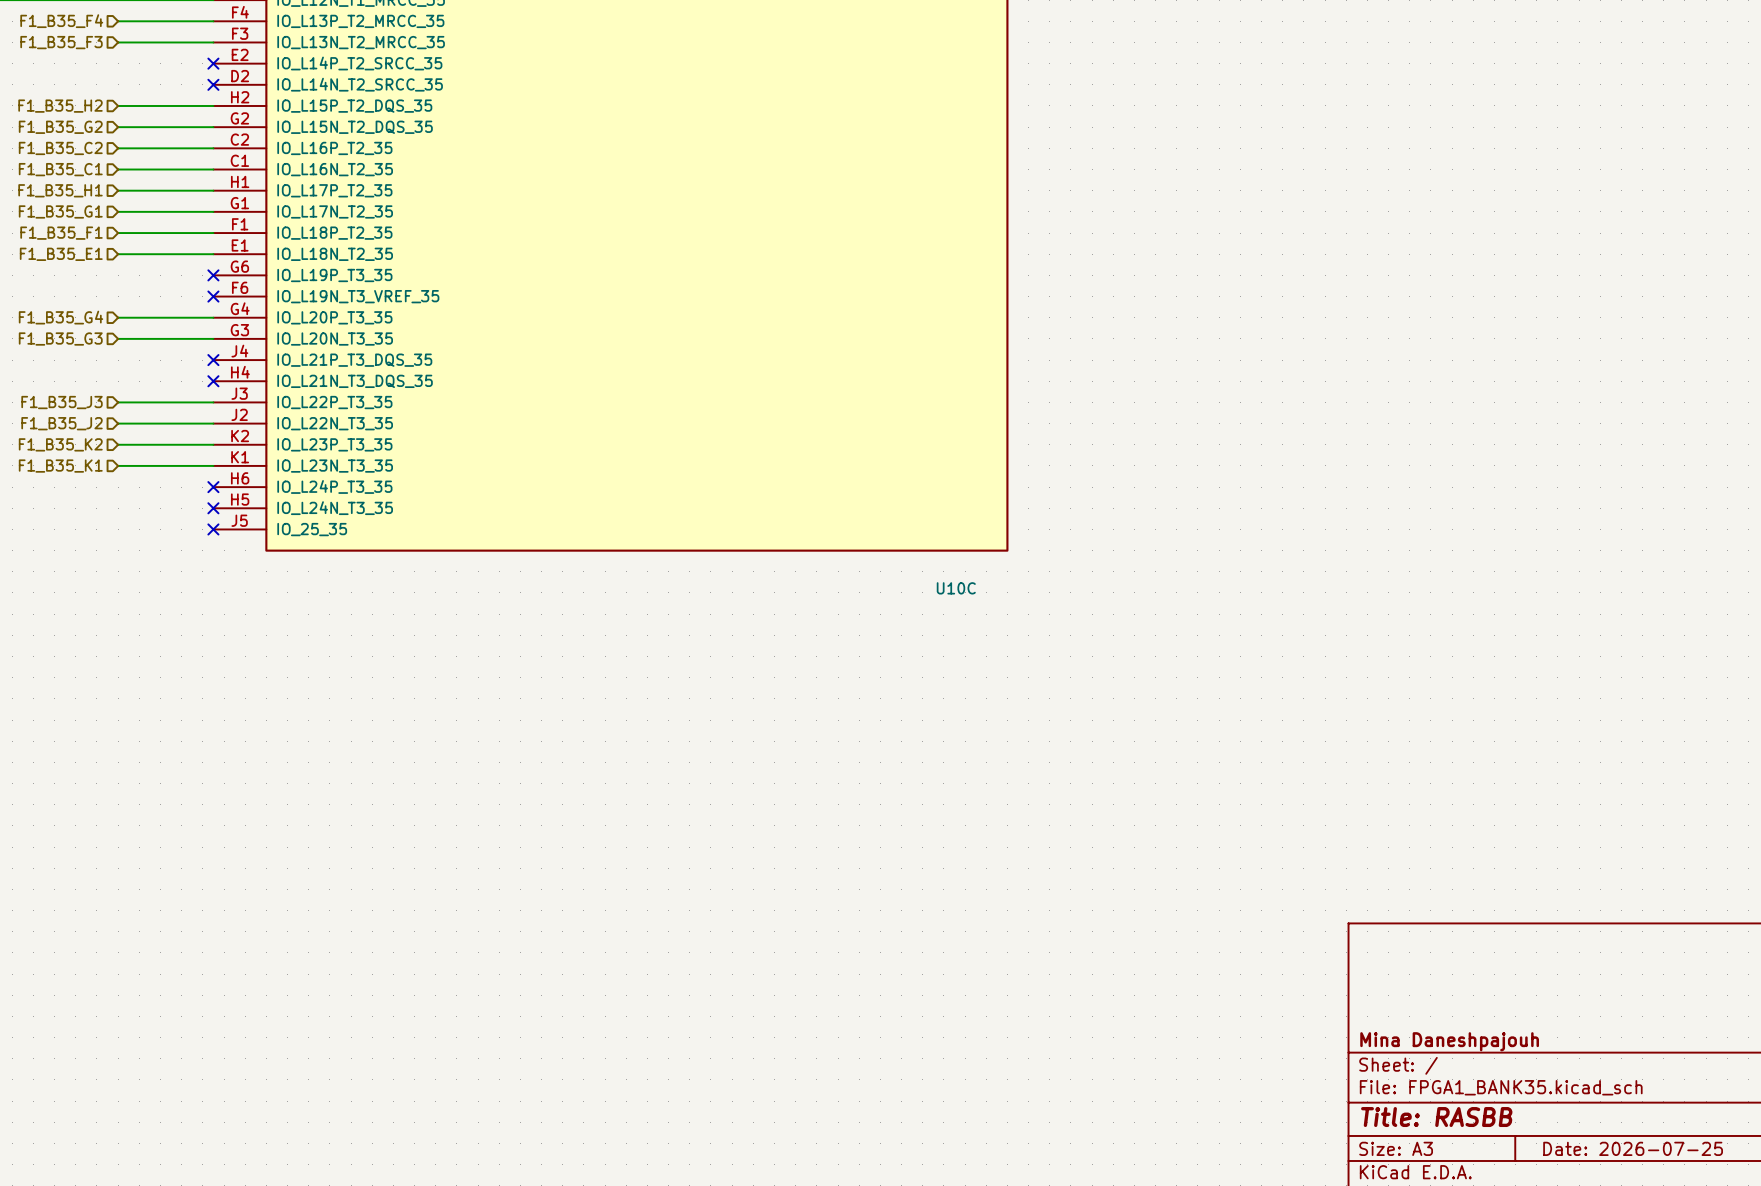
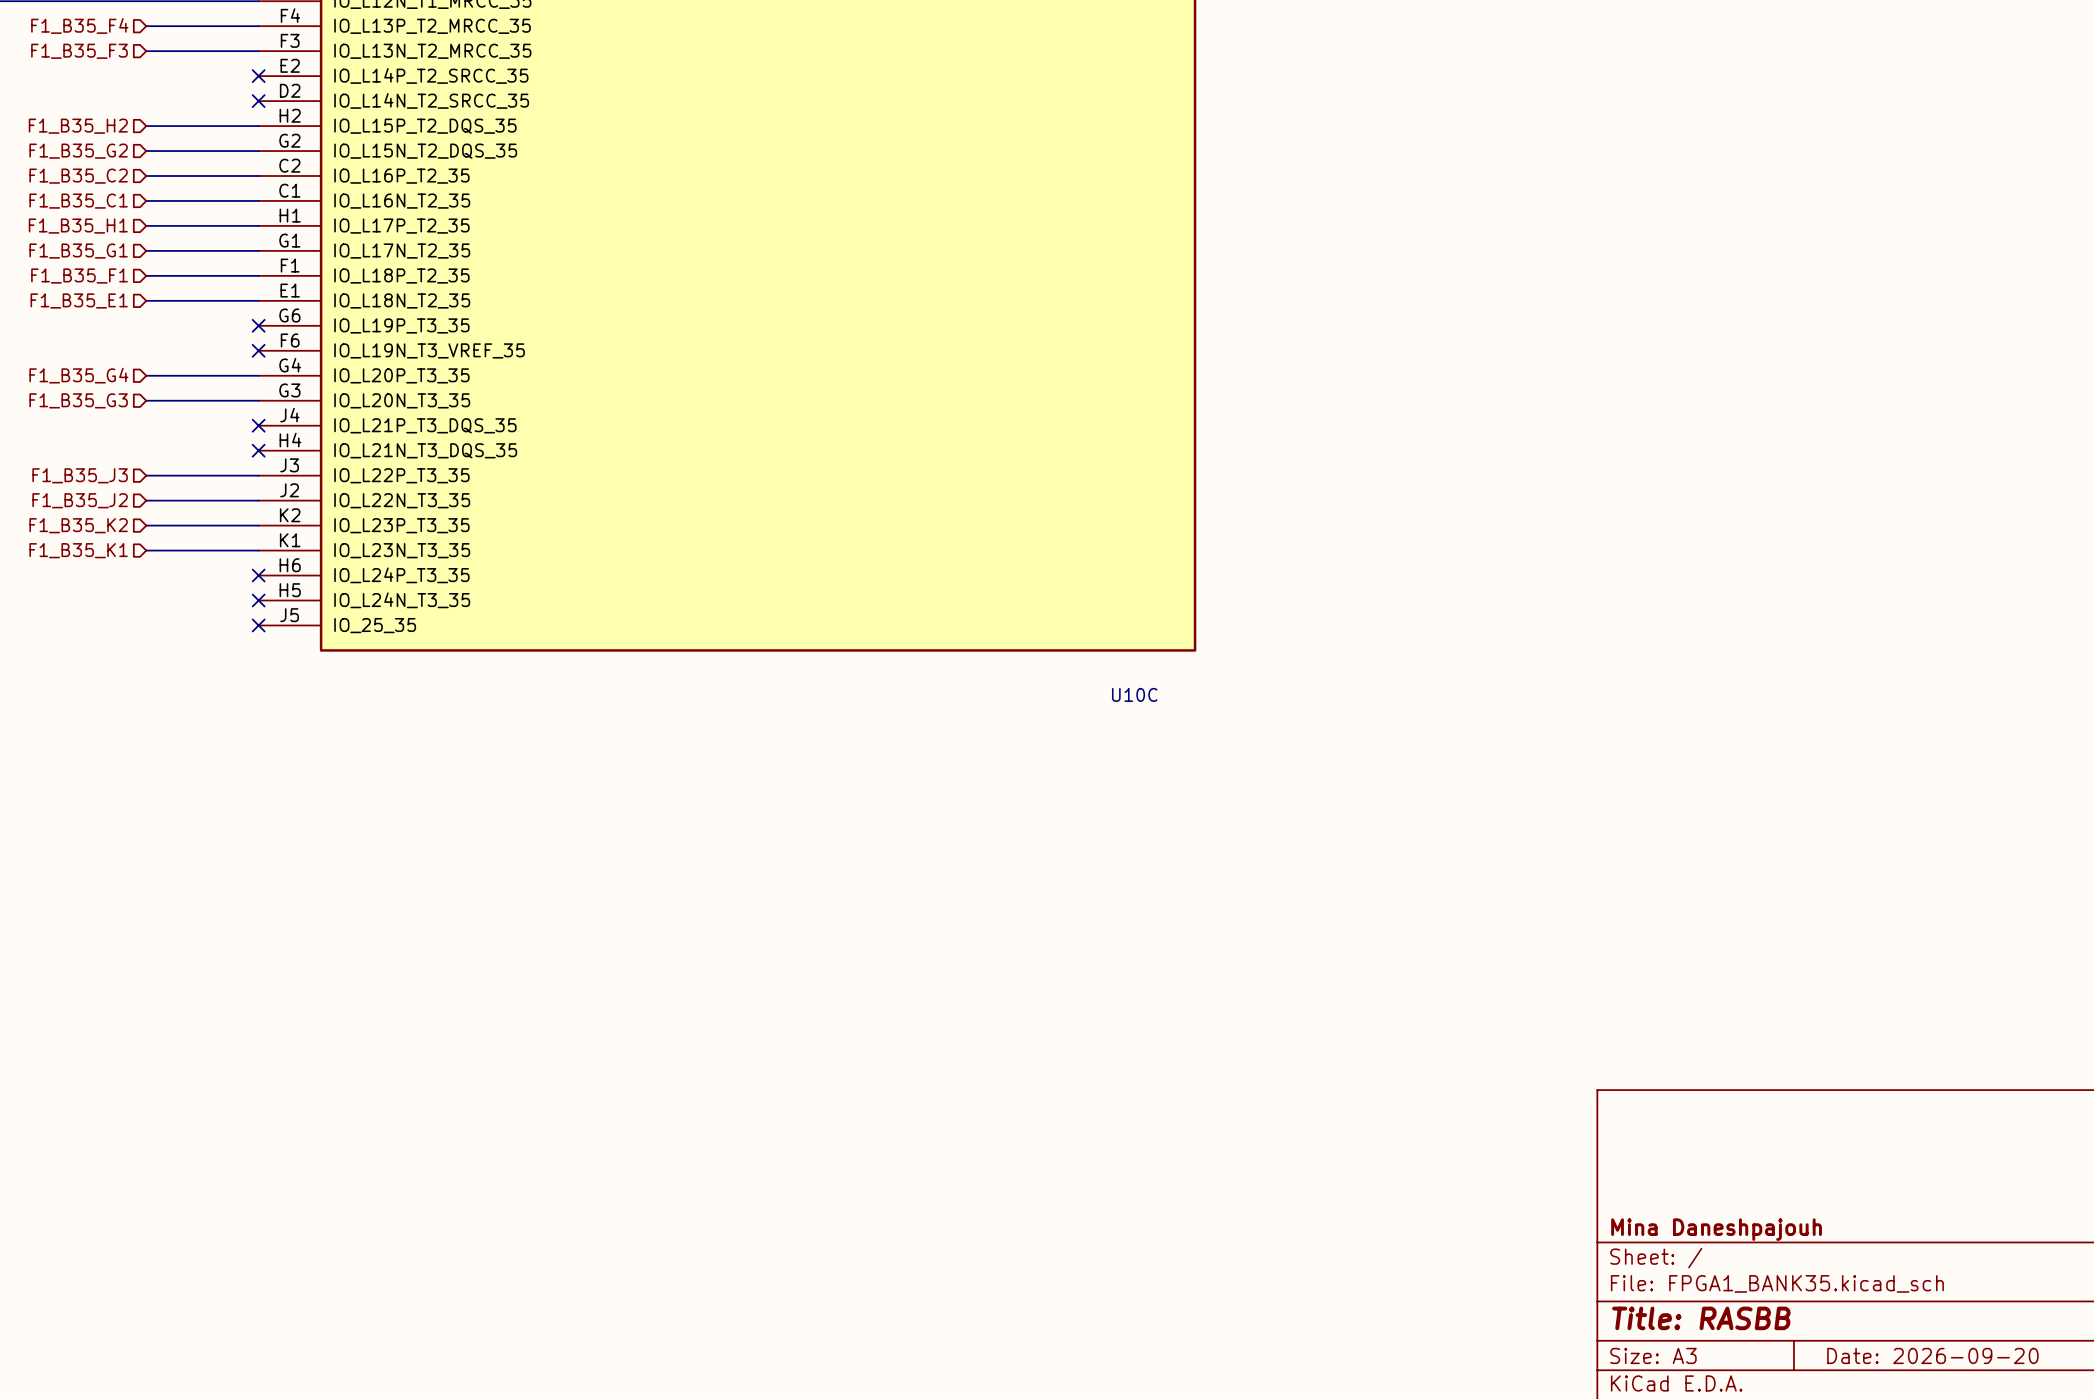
title block: Date: 2026-07-25 (1633, 1148) -> Date: 2026-09-20 (1932, 1355)

